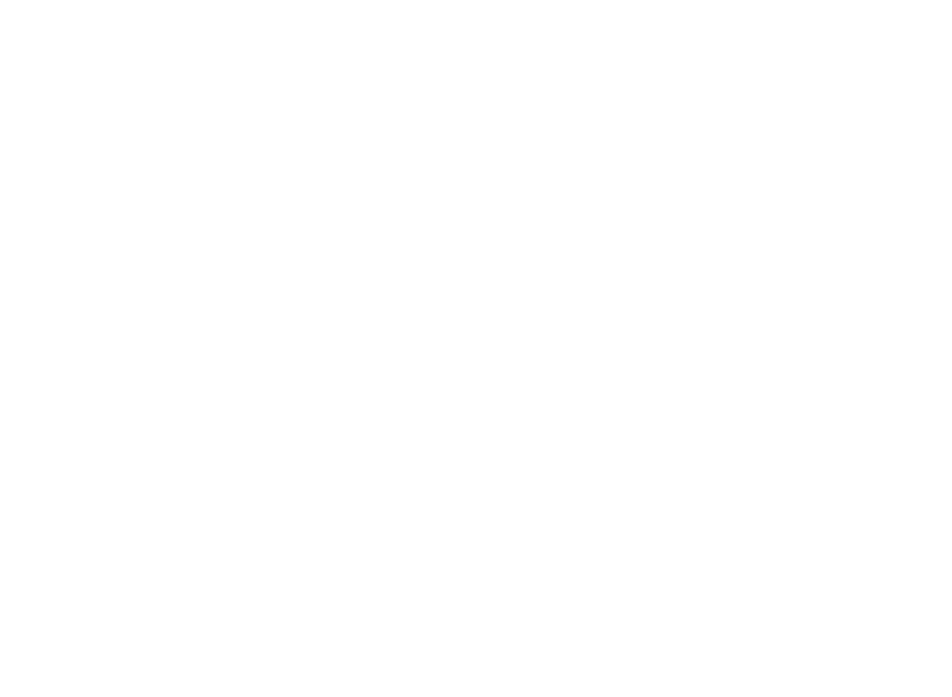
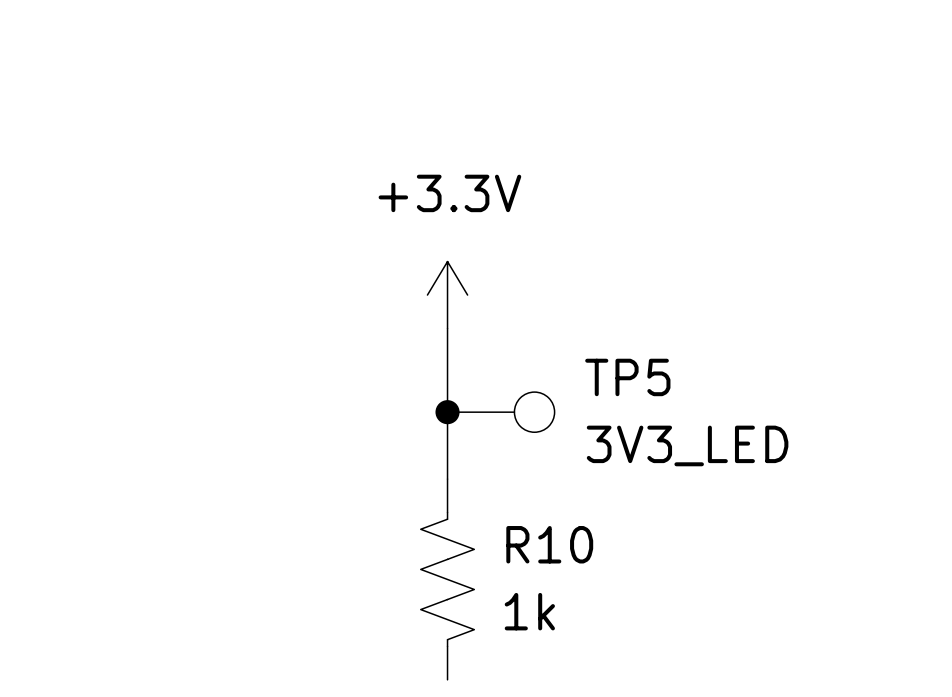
power symbol: none -> +3.3V (447, 295)
wire: none -> (447, 328) (447, 479)
junction: none -> (447, 412)
TP5: none -> 3V3_LED (501, 412)
R10: none -> 1k (447, 579)

